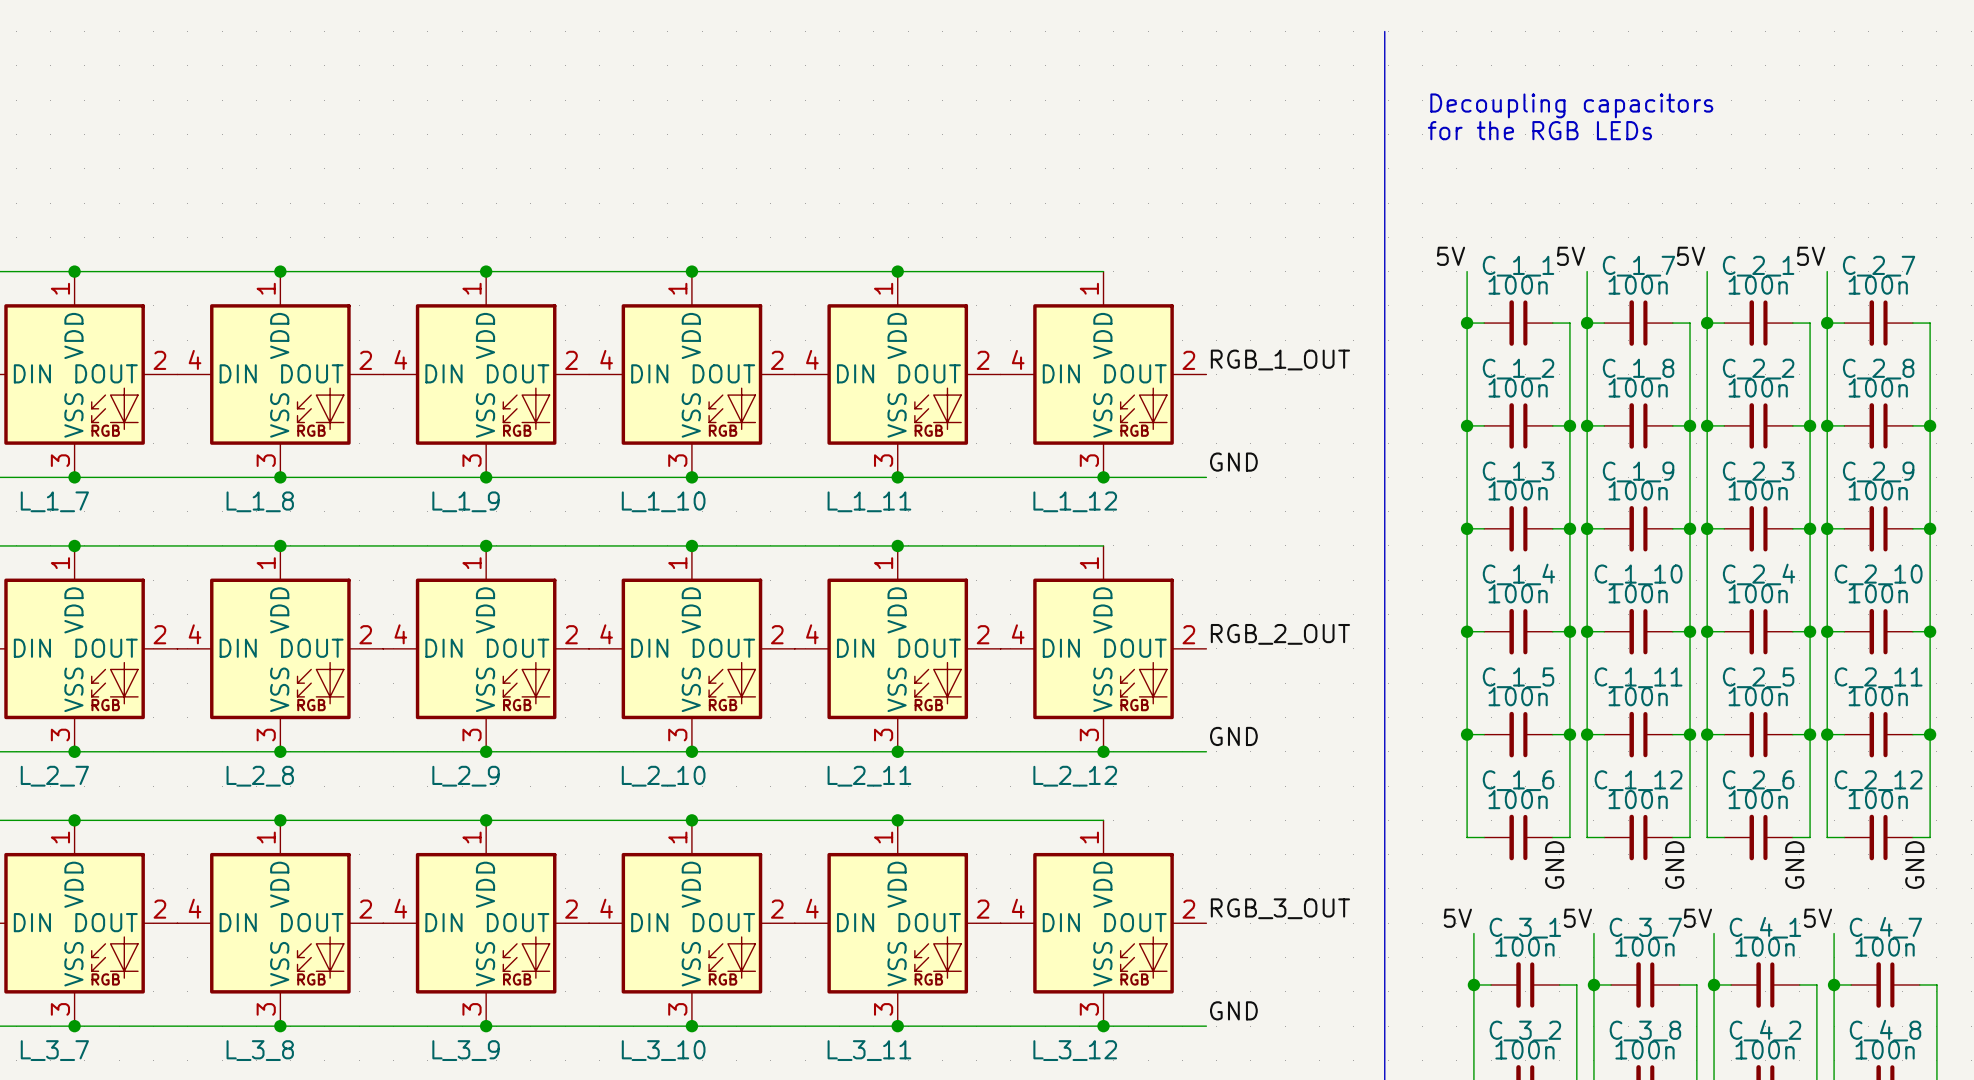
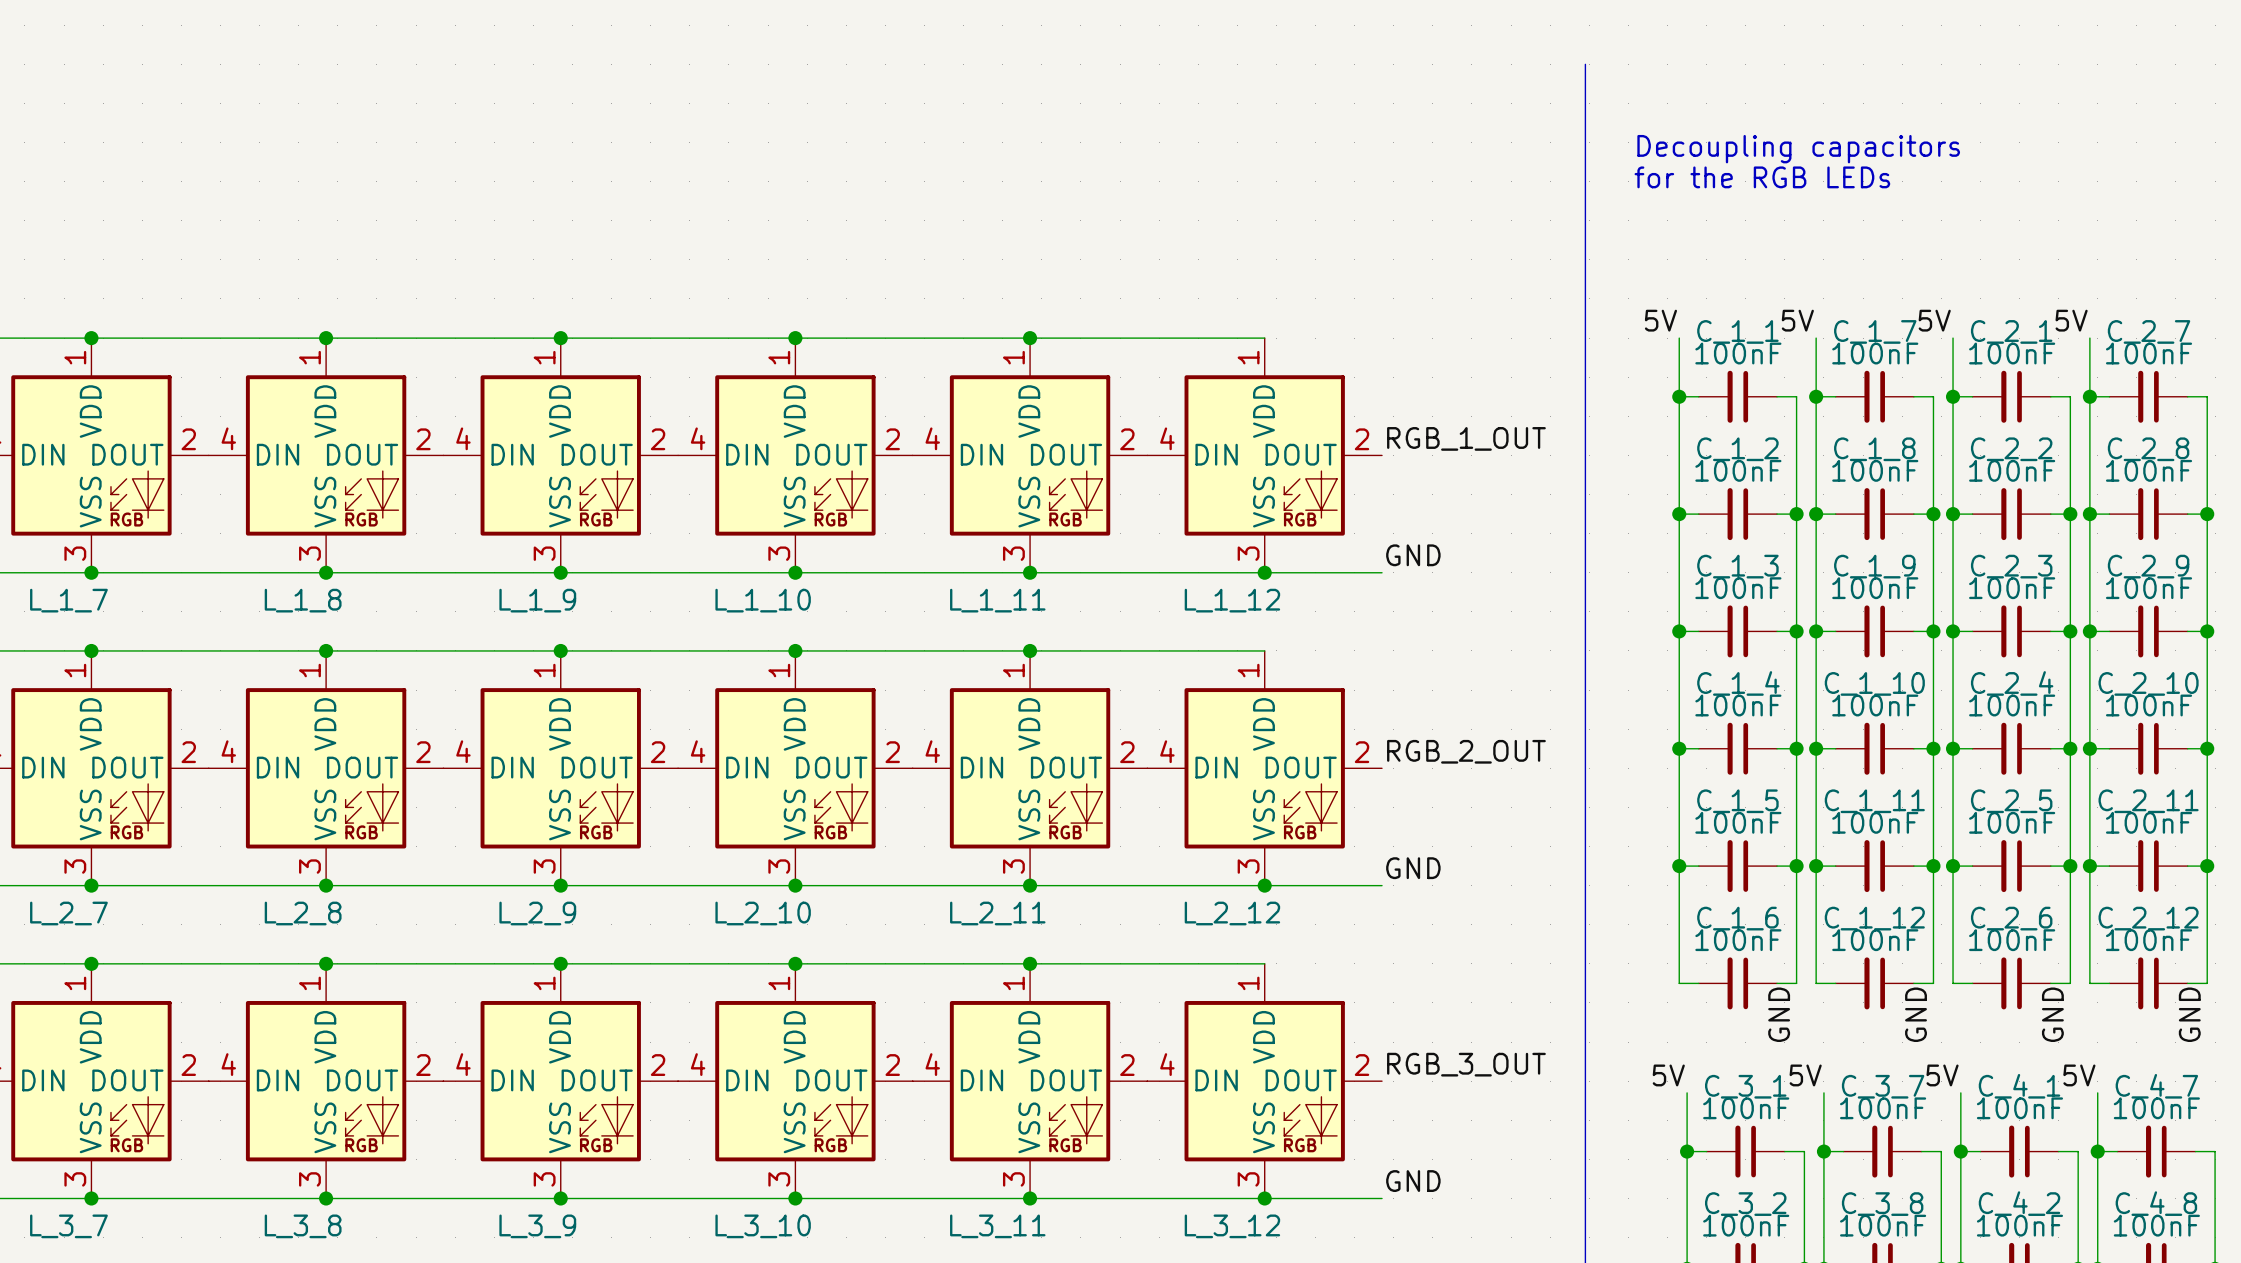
C_1_1 value: 100n (1518, 285) -> 100nF (1738, 353)
C_1_7 value: 100n (1638, 285) -> 100nF (1875, 353)
C_2_1 value: 100n (1758, 285) -> 100nF (2012, 353)
C_2_7 value: 100n (1878, 285) -> 100nF (2149, 353)
C_1_2 value: 100n (1518, 387) -> 100nF (1738, 470)
C_1_8 value: 100n (1638, 387) -> 100nF (1875, 470)
C_2_2 value: 100n (1758, 387) -> 100nF (2012, 470)
C_2_8 value: 100n (1878, 387) -> 100nF (2149, 470)
C_1_3 value: 100n (1518, 490) -> 100nF (1738, 588)
C_1_9 value: 100n (1638, 490) -> 100nF (1875, 588)
C_2_3 value: 100n (1758, 490) -> 100nF (2012, 588)
C_2_9 value: 100n (1878, 490) -> 100nF (2149, 588)
C_1_4 value: 100n (1518, 593) -> 100nF (1738, 705)
C_1_10 value: 100n (1638, 593) -> 100nF (1875, 705)
C_2_4 value: 100n (1758, 593) -> 100nF (2012, 705)
C_2_10 value: 100n (1878, 593) -> 100nF (2149, 705)
C_1_5 value: 100n (1518, 696) -> 100nF (1738, 822)
C_1_11 value: 100n (1638, 696) -> 100nF (1875, 822)
C_2_5 value: 100n (1758, 696) -> 100nF (2012, 822)
C_2_11 value: 100n (1878, 696) -> 100nF (2149, 822)
C_1_6 value: 100n (1518, 799) -> 100nF (1738, 940)
C_1_12 value: 100n (1638, 799) -> 100nF (1875, 940)
C_2_6 value: 100n (1758, 799) -> 100nF (2012, 940)
C_2_12 value: 100n (1878, 799) -> 100nF (2149, 940)
C_3_1 value: 100n (1524, 947) -> 100nF (1746, 1108)
C_3_7 value: 100n (1645, 947) -> 100nF (1883, 1108)
C_4_1 value: 100n (1765, 947) -> 100nF (2019, 1108)
C_4_7 value: 100n (1885, 947) -> 100nF (2156, 1108)
C_3_2 value: 100n (1524, 1049) -> 100nF (1746, 1225)
C_3_8 value: 100n (1645, 1049) -> 100nF (1883, 1225)
C_4_2 value: 100n (1765, 1049) -> 100nF (2019, 1225)
C_4_8 value: 100n (1885, 1049) -> 100nF (2156, 1225)

